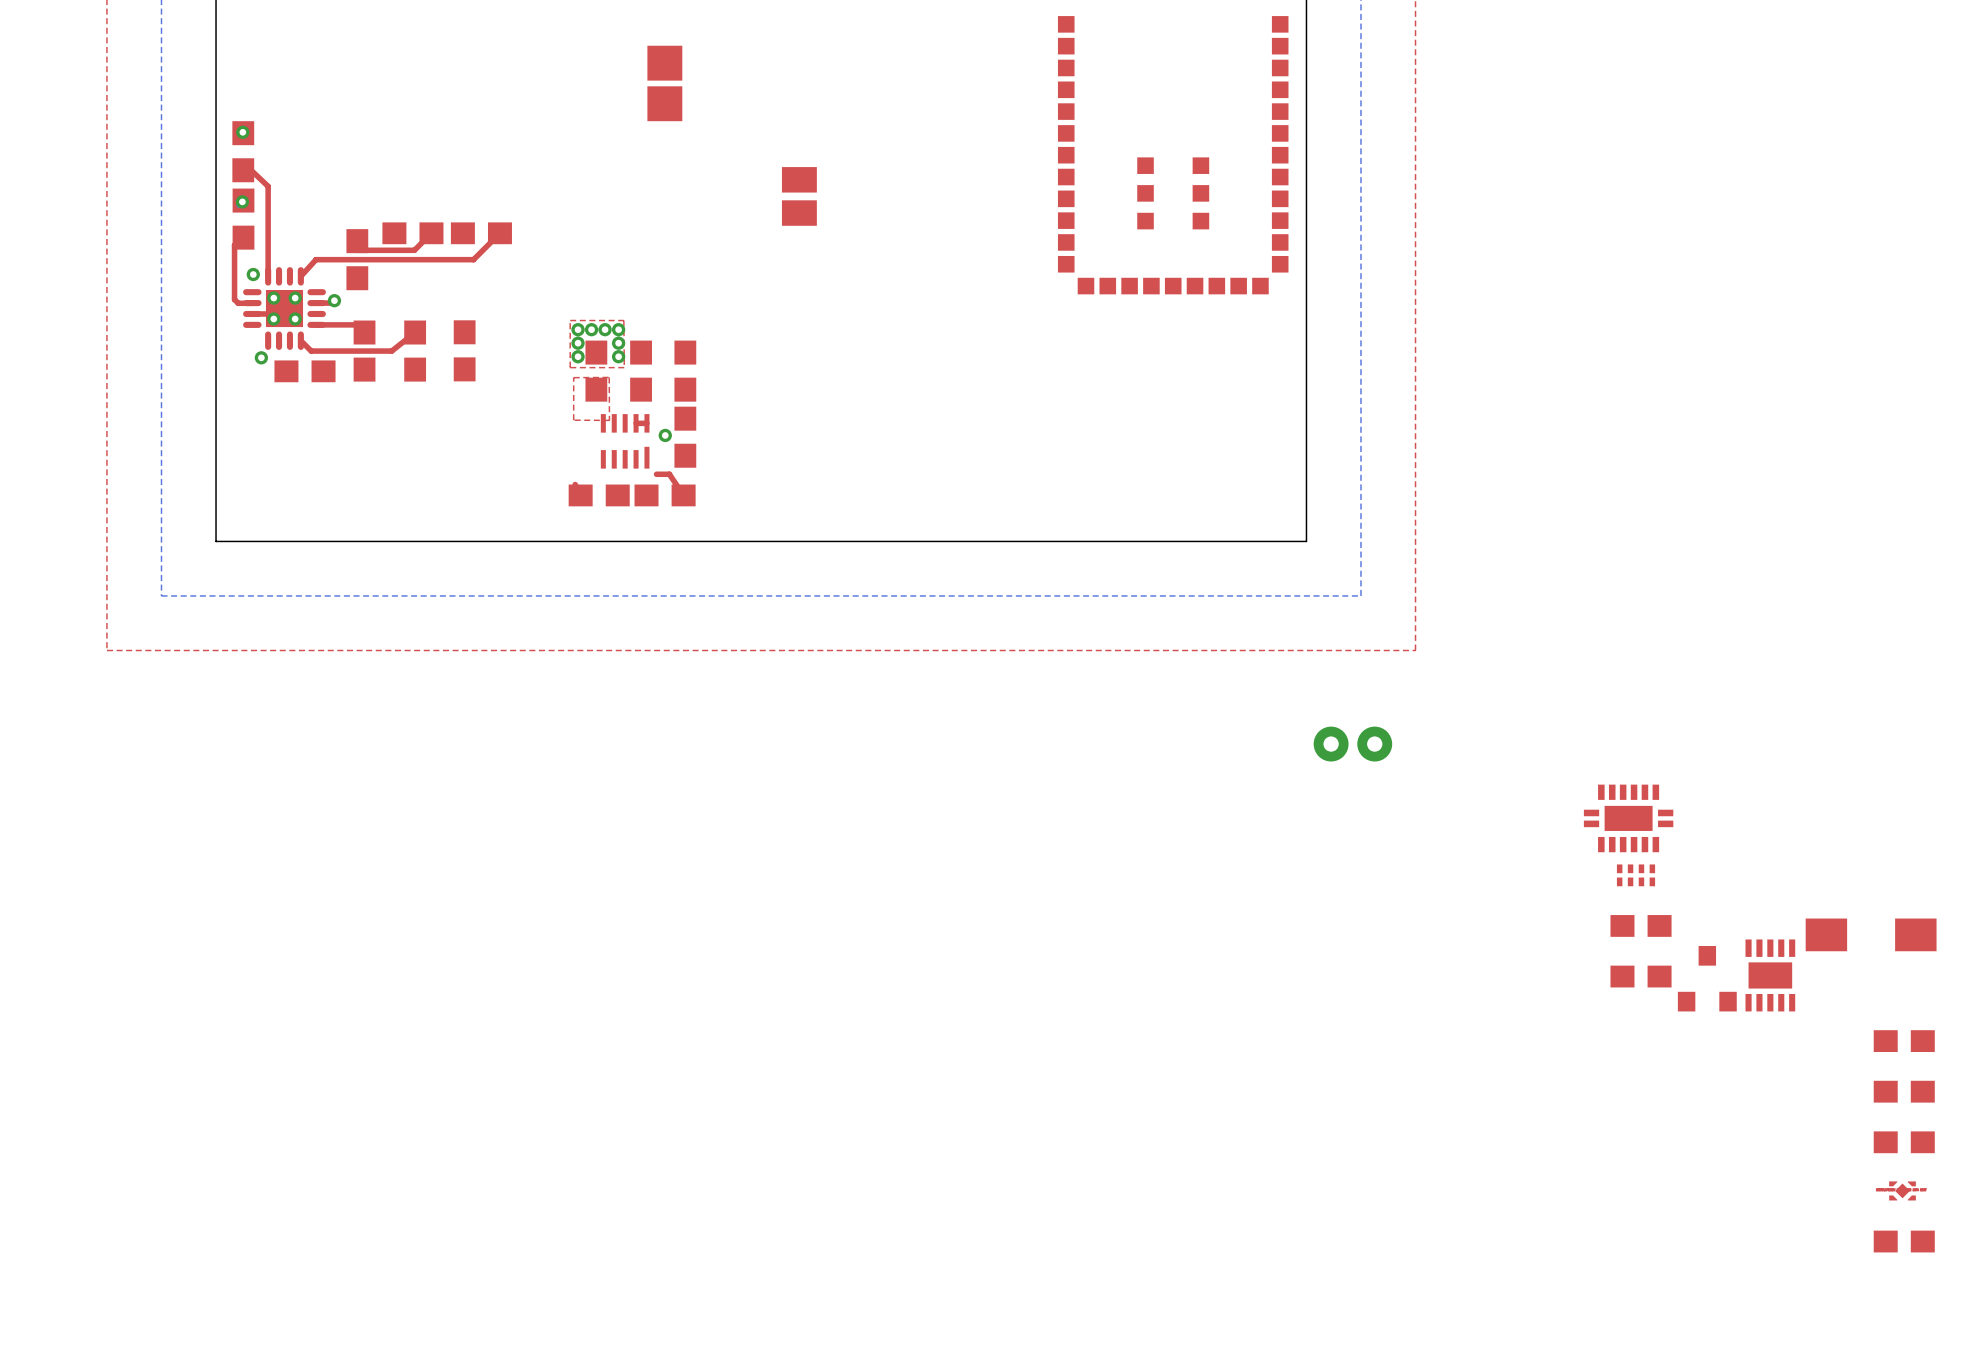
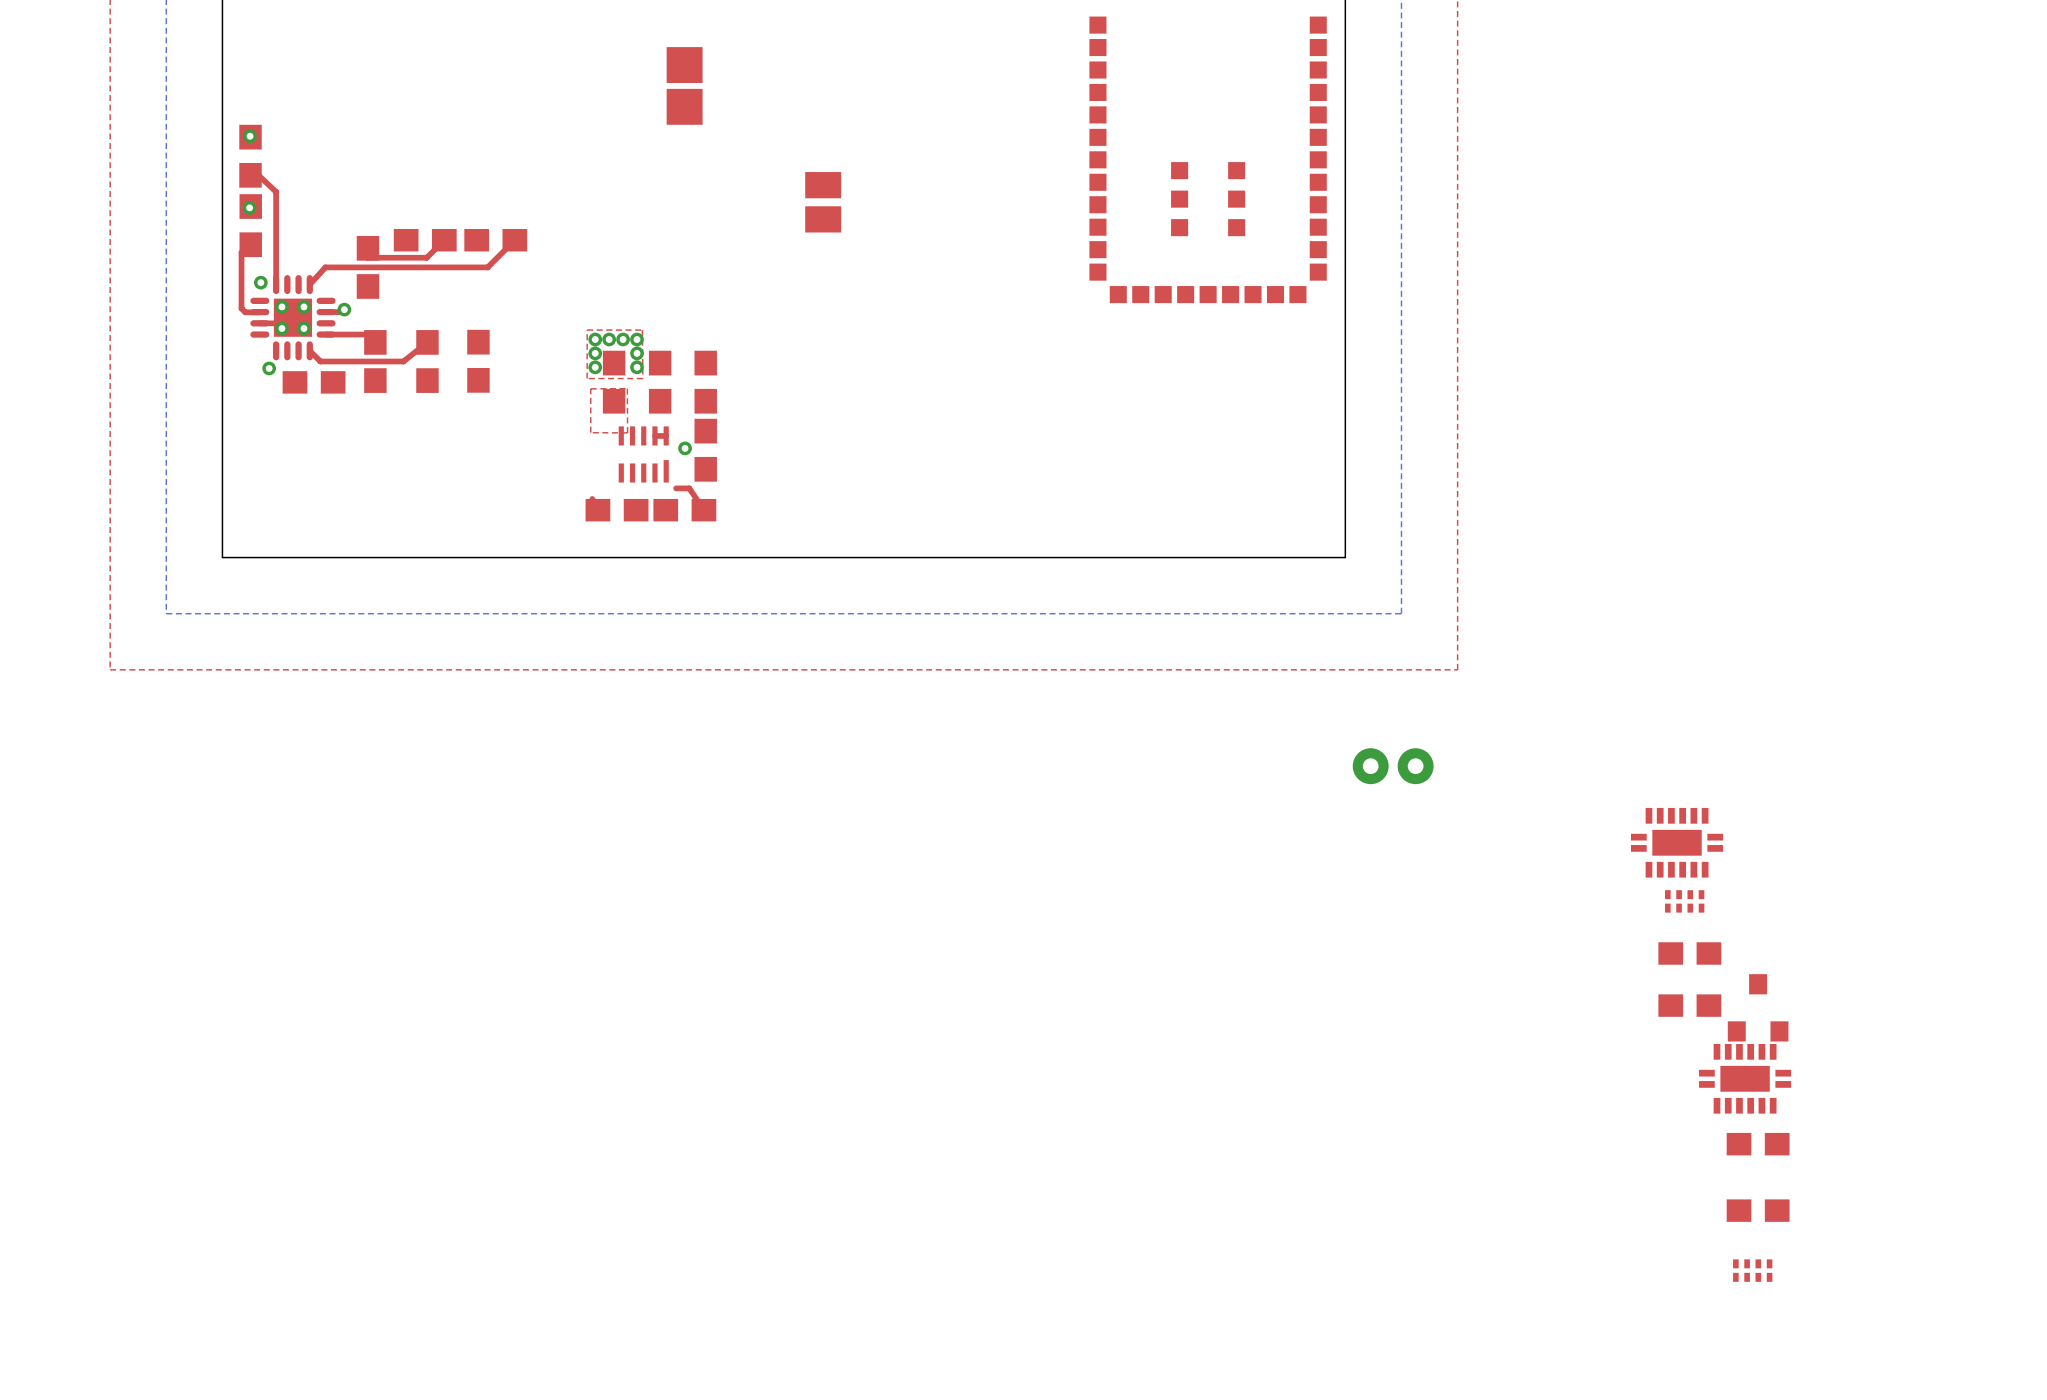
part: (1871, 934) -> none
part: (1770, 975) -> none
part: (1904, 1041) -> none
part: none -> (1745, 1078)
part: (1904, 1091) -> none
part: none -> (1758, 1144)
part: (1904, 1142) -> none
part: none -> (1758, 1210)
part: (1902, 1190) -> none
part: none -> (1752, 1270)
part: (1904, 1241) -> none

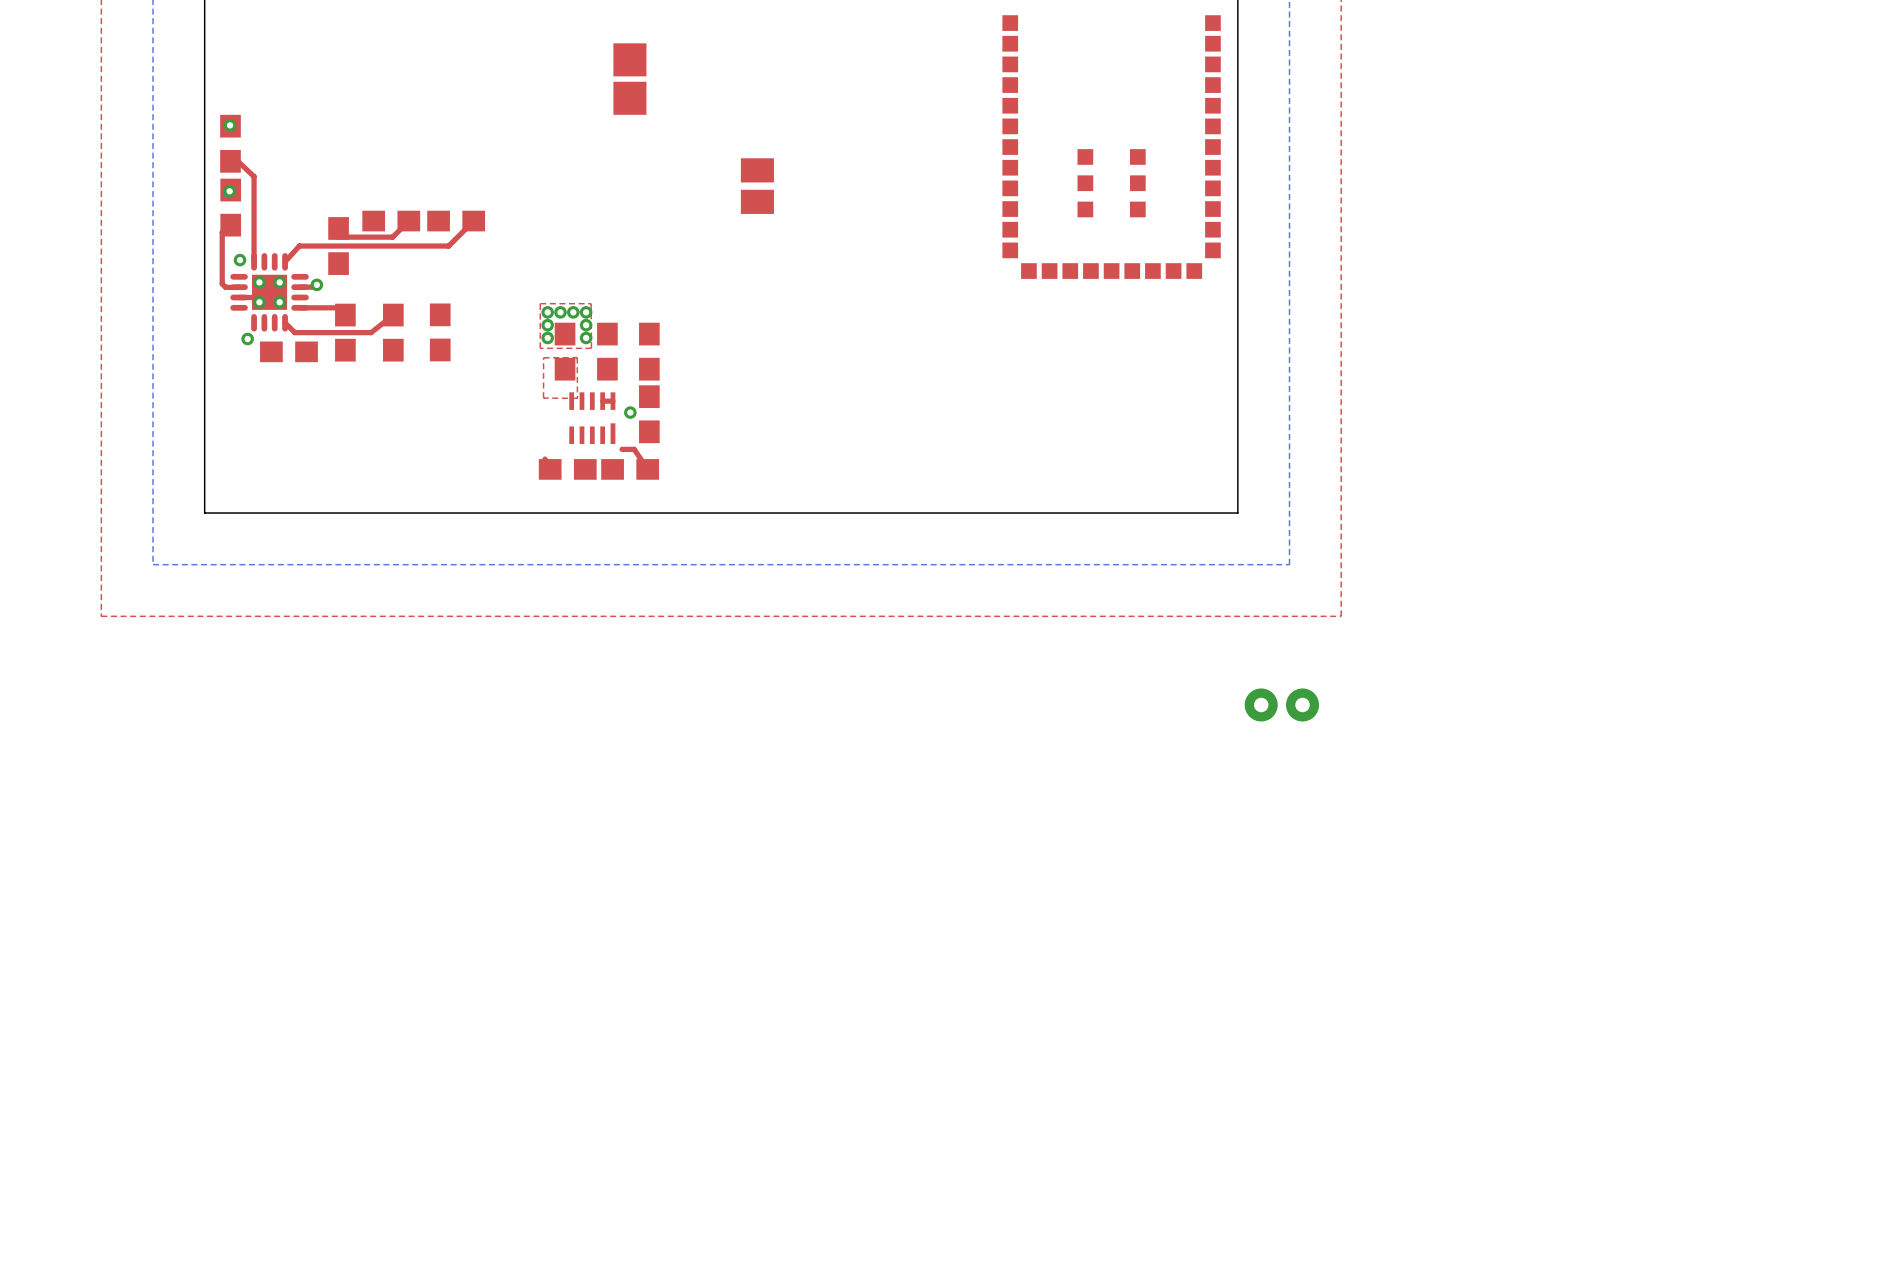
part: (1677, 842) -> none
part: (1684, 901) -> none
part: (1689, 953) -> none
part: (1689, 1005) -> none
part: (1758, 1007) -> none
part: (1745, 1078) -> none
part: (1758, 1144) -> none
part: (1758, 1210) -> none
part: (1752, 1270) -> none

